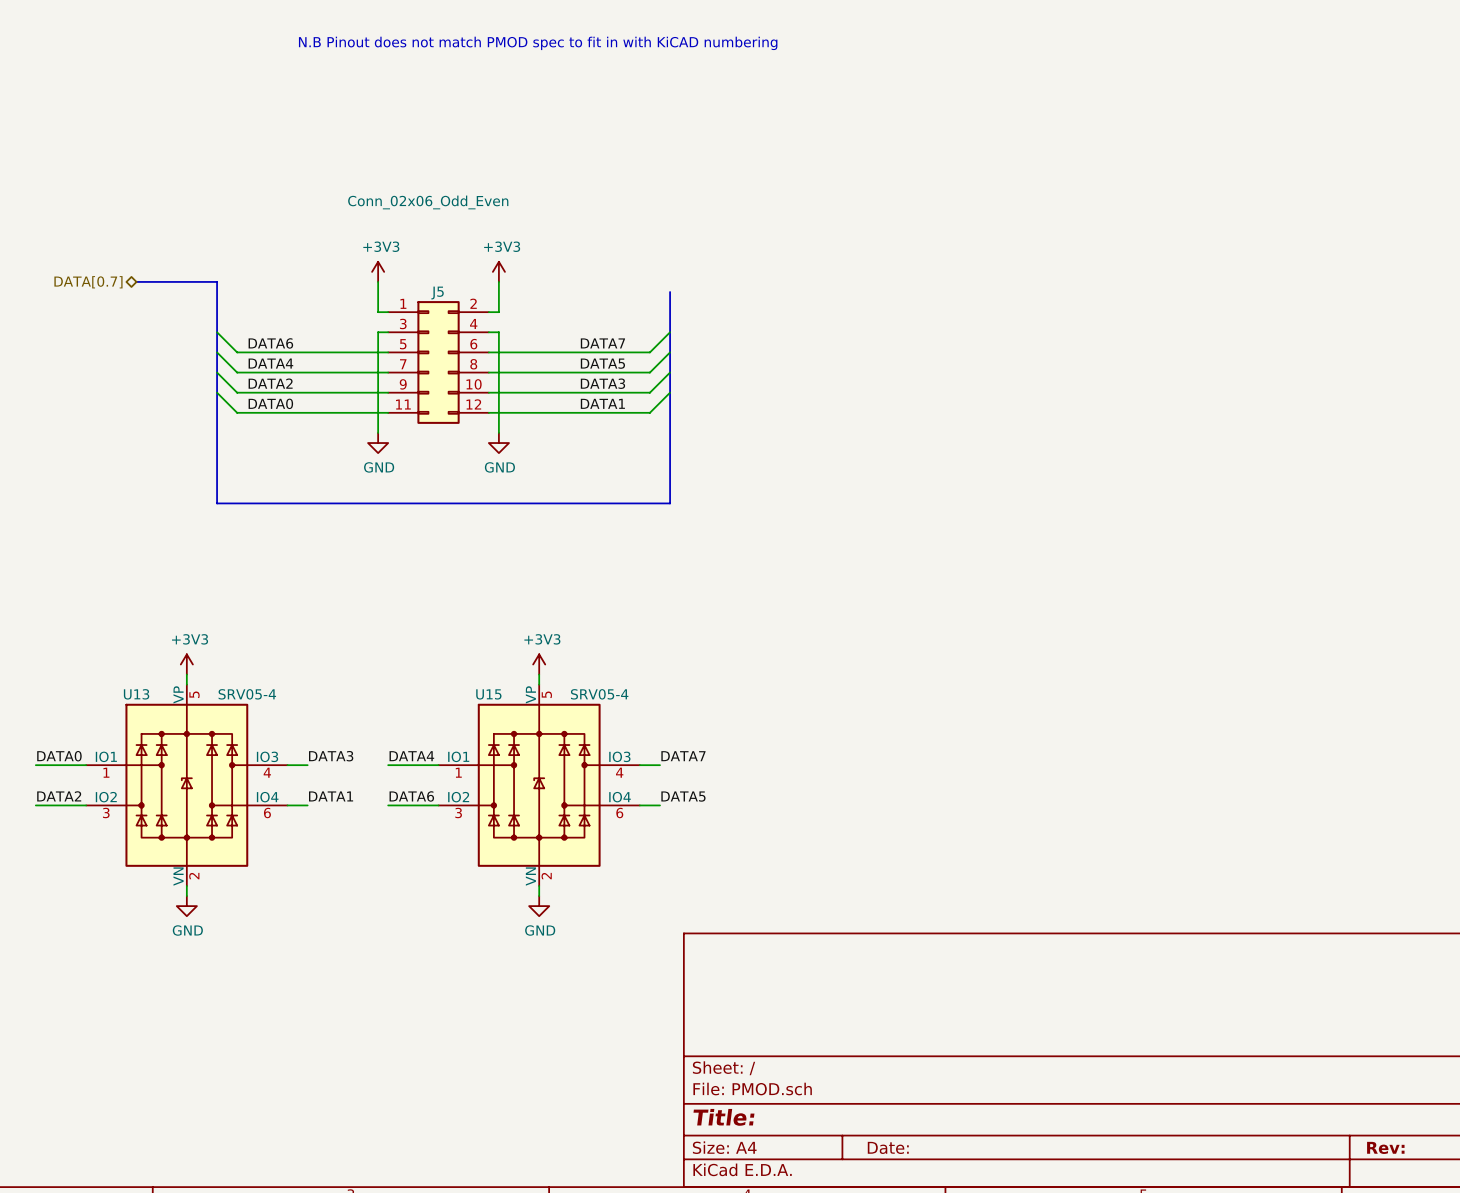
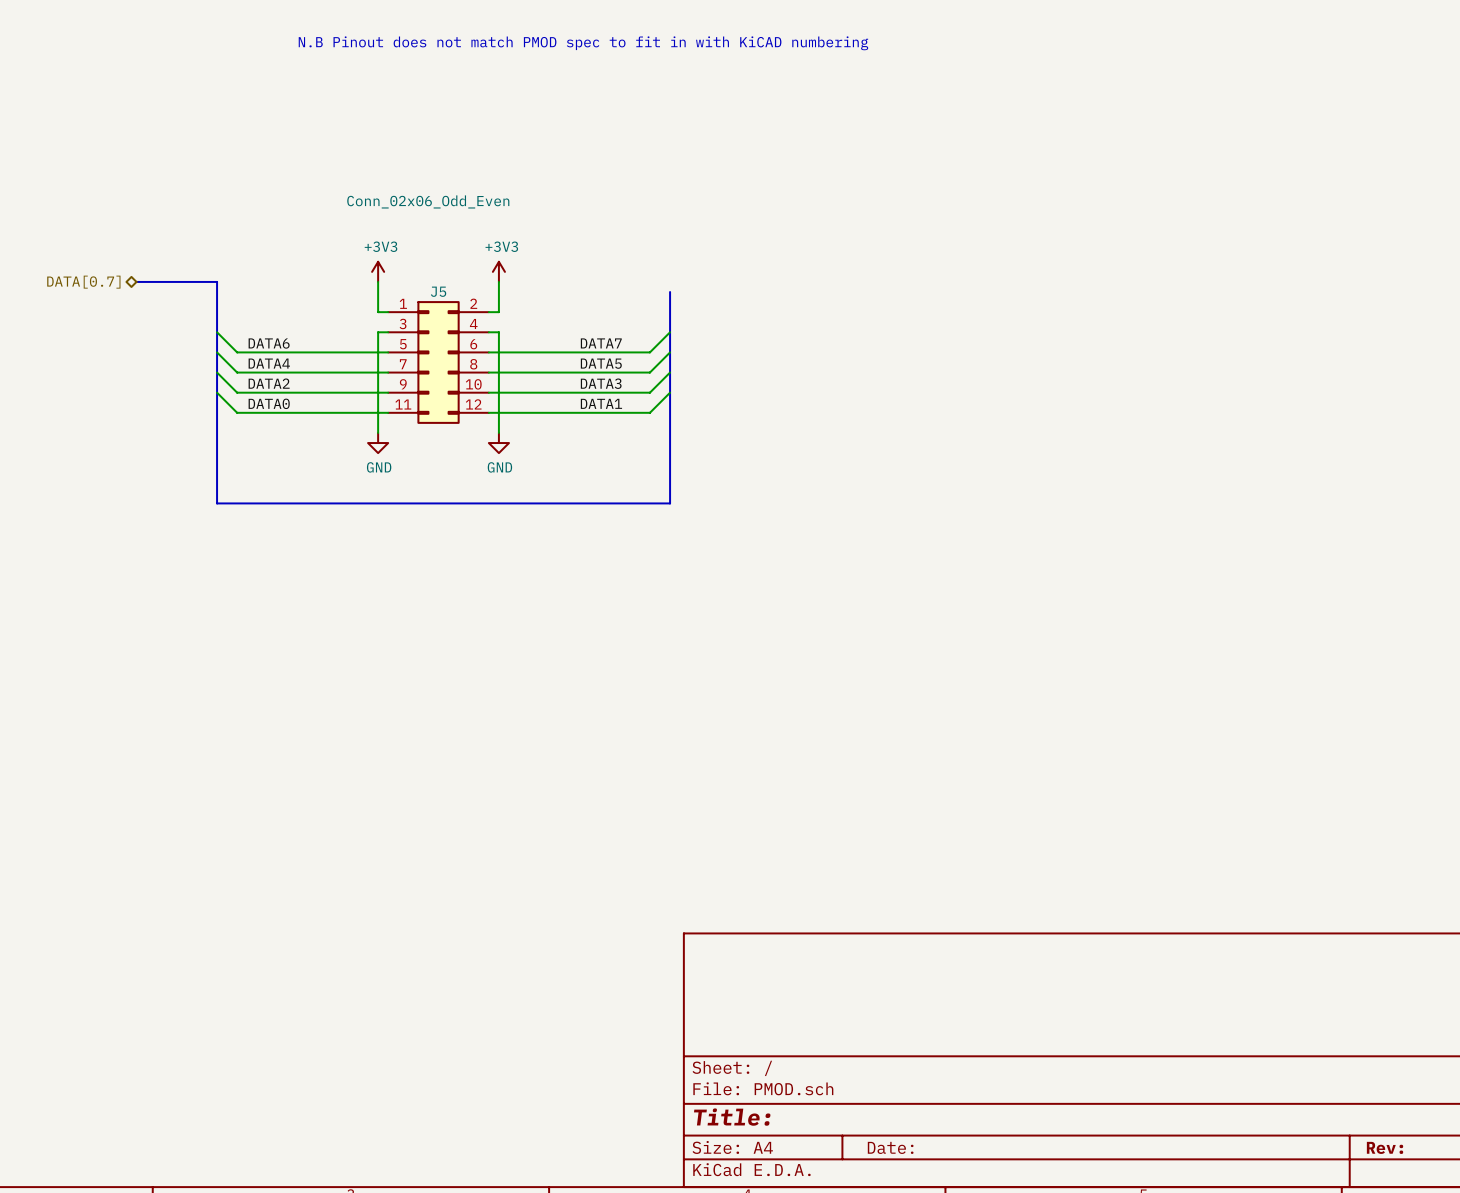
power symbol: +3V3 (186, 664) -> none
power symbol: +3V3 (539, 664) -> none
wire: (186, 674) (186, 684) -> none
wire: (539, 674) (539, 684) -> none
label: DATA0 (59, 756) -> none
label: DATA3 (331, 756) -> none
label: DATA4 (411, 756) -> none
label: DATA7 (683, 756) -> none
wire: (35, 765) (86, 765) -> none
wire: (287, 765) (307, 765) -> none
wire: (388, 765) (438, 765) -> none
wire: (639, 765) (660, 765) -> none
U13: SRV05-4 (186, 785) -> none
U15: SRV05-4 (539, 785) -> none
label: DATA2 (59, 796) -> none
label: DATA1 (331, 796) -> none
label: DATA6 (411, 796) -> none
label: DATA5 (683, 796) -> none
wire: (35, 805) (86, 805) -> none
wire: (287, 805) (307, 805) -> none
wire: (388, 805) (438, 805) -> none
wire: (639, 805) (660, 805) -> none
wire: (186, 885) (186, 896) -> none
wire: (539, 885) (539, 896) -> none
power symbol: GND (186, 906) -> none
power symbol: GND (539, 906) -> none

